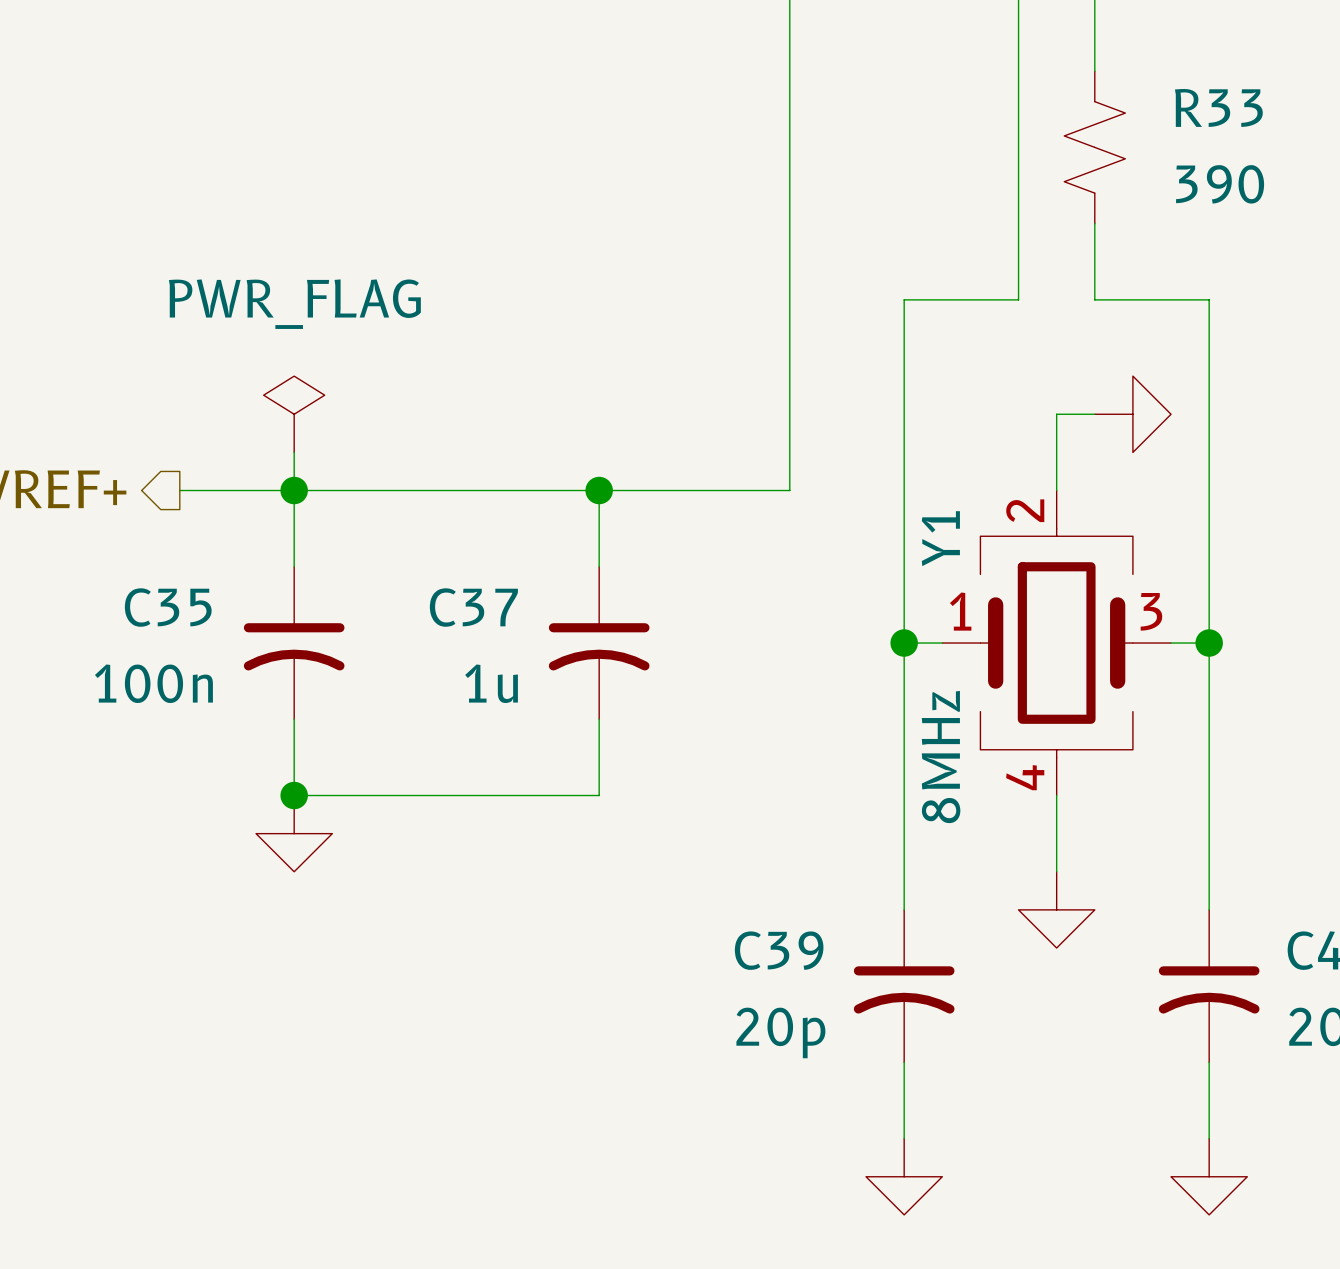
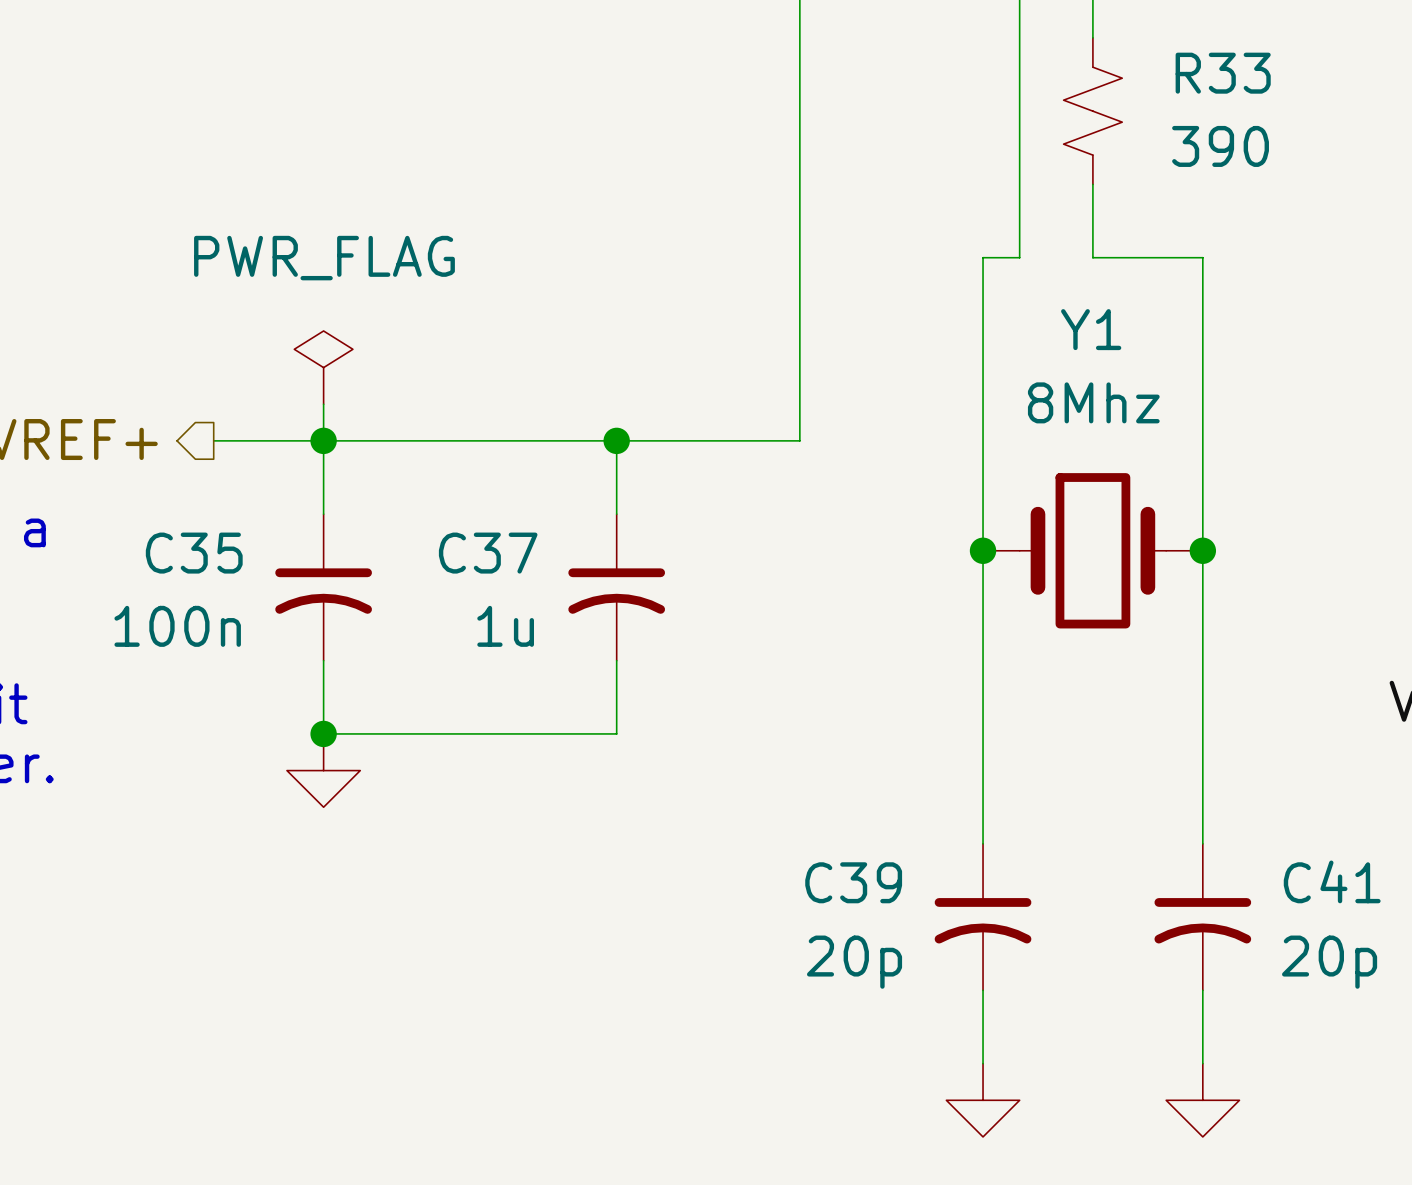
wire: (980, 299) (904, 299) (904, 909) -> (983, 257) (983, 843)
wire: (1094, 414) (1056, 414) (1056, 490) -> none
power symbol: (1132, 414) -> none
Y1 symbol: [942, 490, 1172, 796] -> [983, 473, 1203, 629]
Y1 name position: Y1 (940, 538) -> Y1 (1091, 329)
wire: (904, 643) (942, 643) -> none
junction position: (904, 643) -> (983, 550)
wire: (1171, 643) (1209, 643) -> none
junction position: (1209, 643) -> (1202, 550)
Y1 value: 8MHz (941, 757) -> 8Mhz (1093, 402)
wire: (1056, 795) (1056, 871) -> none
power symbol: (1056, 909) -> none
C39 position: (904, 986) -> (983, 917)
wire: (904, 1062) (904, 1138) -> (983, 990) (983, 1063)
power symbol position: (904, 1176) -> (983, 1100)

